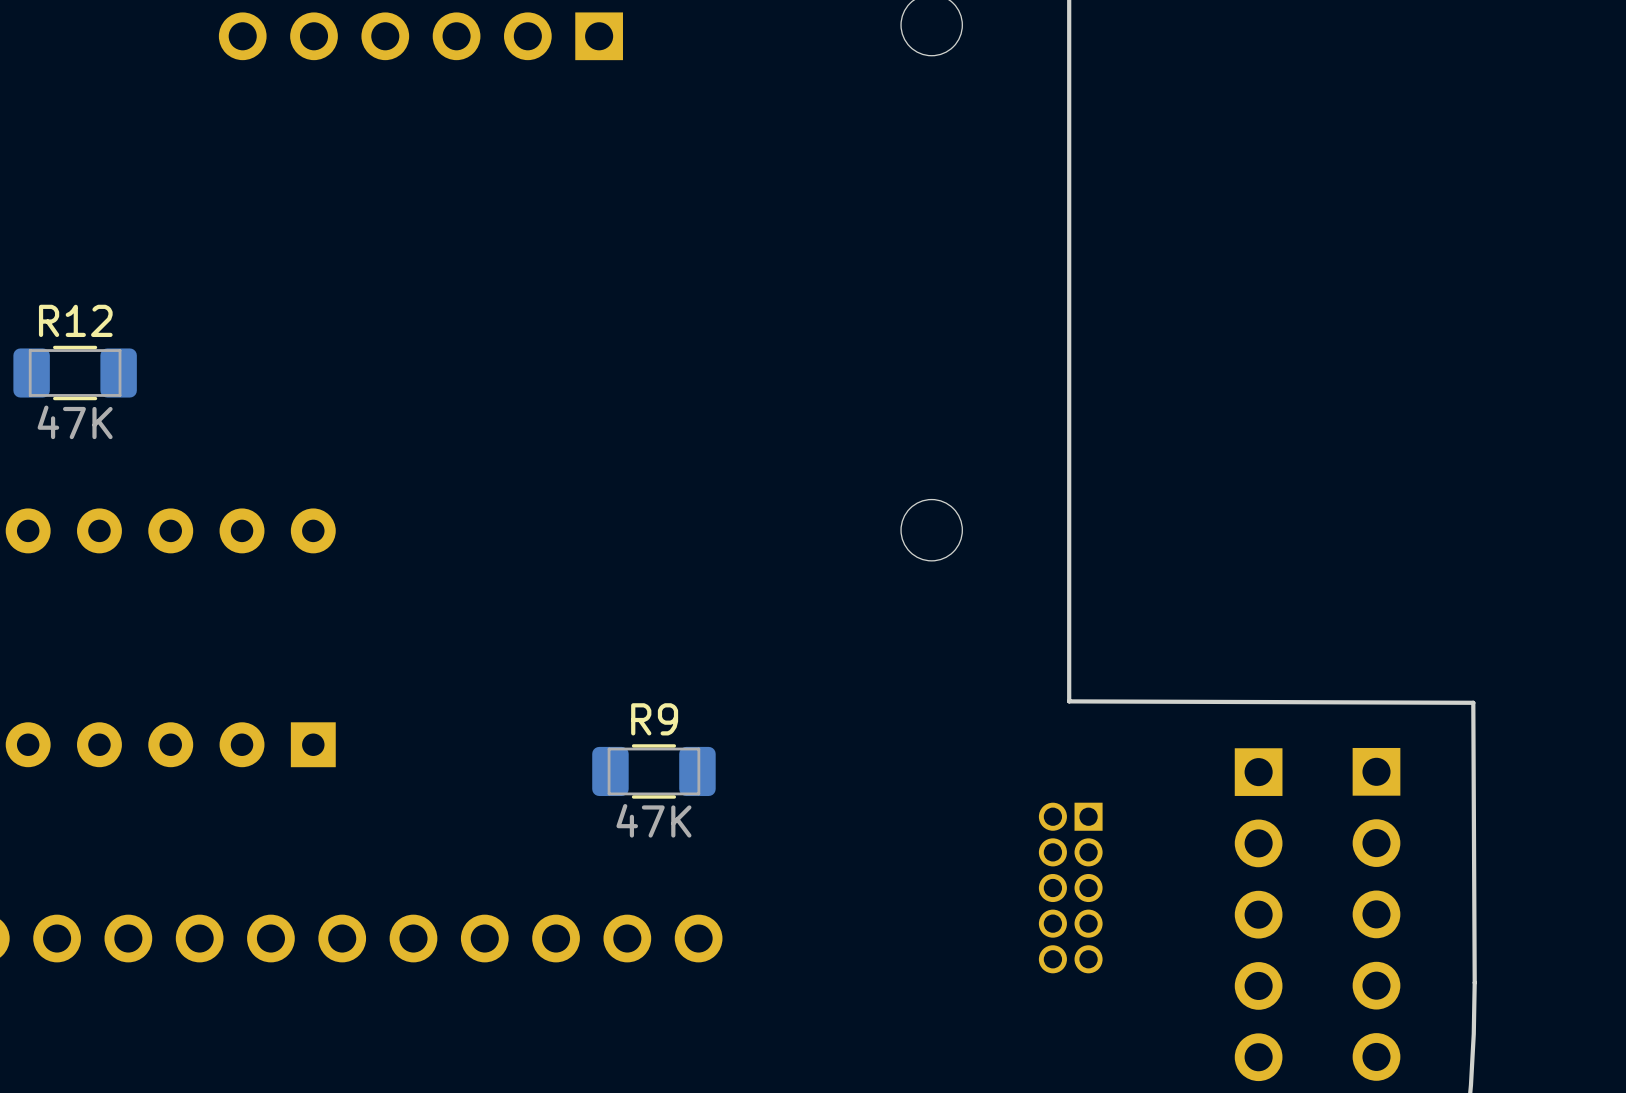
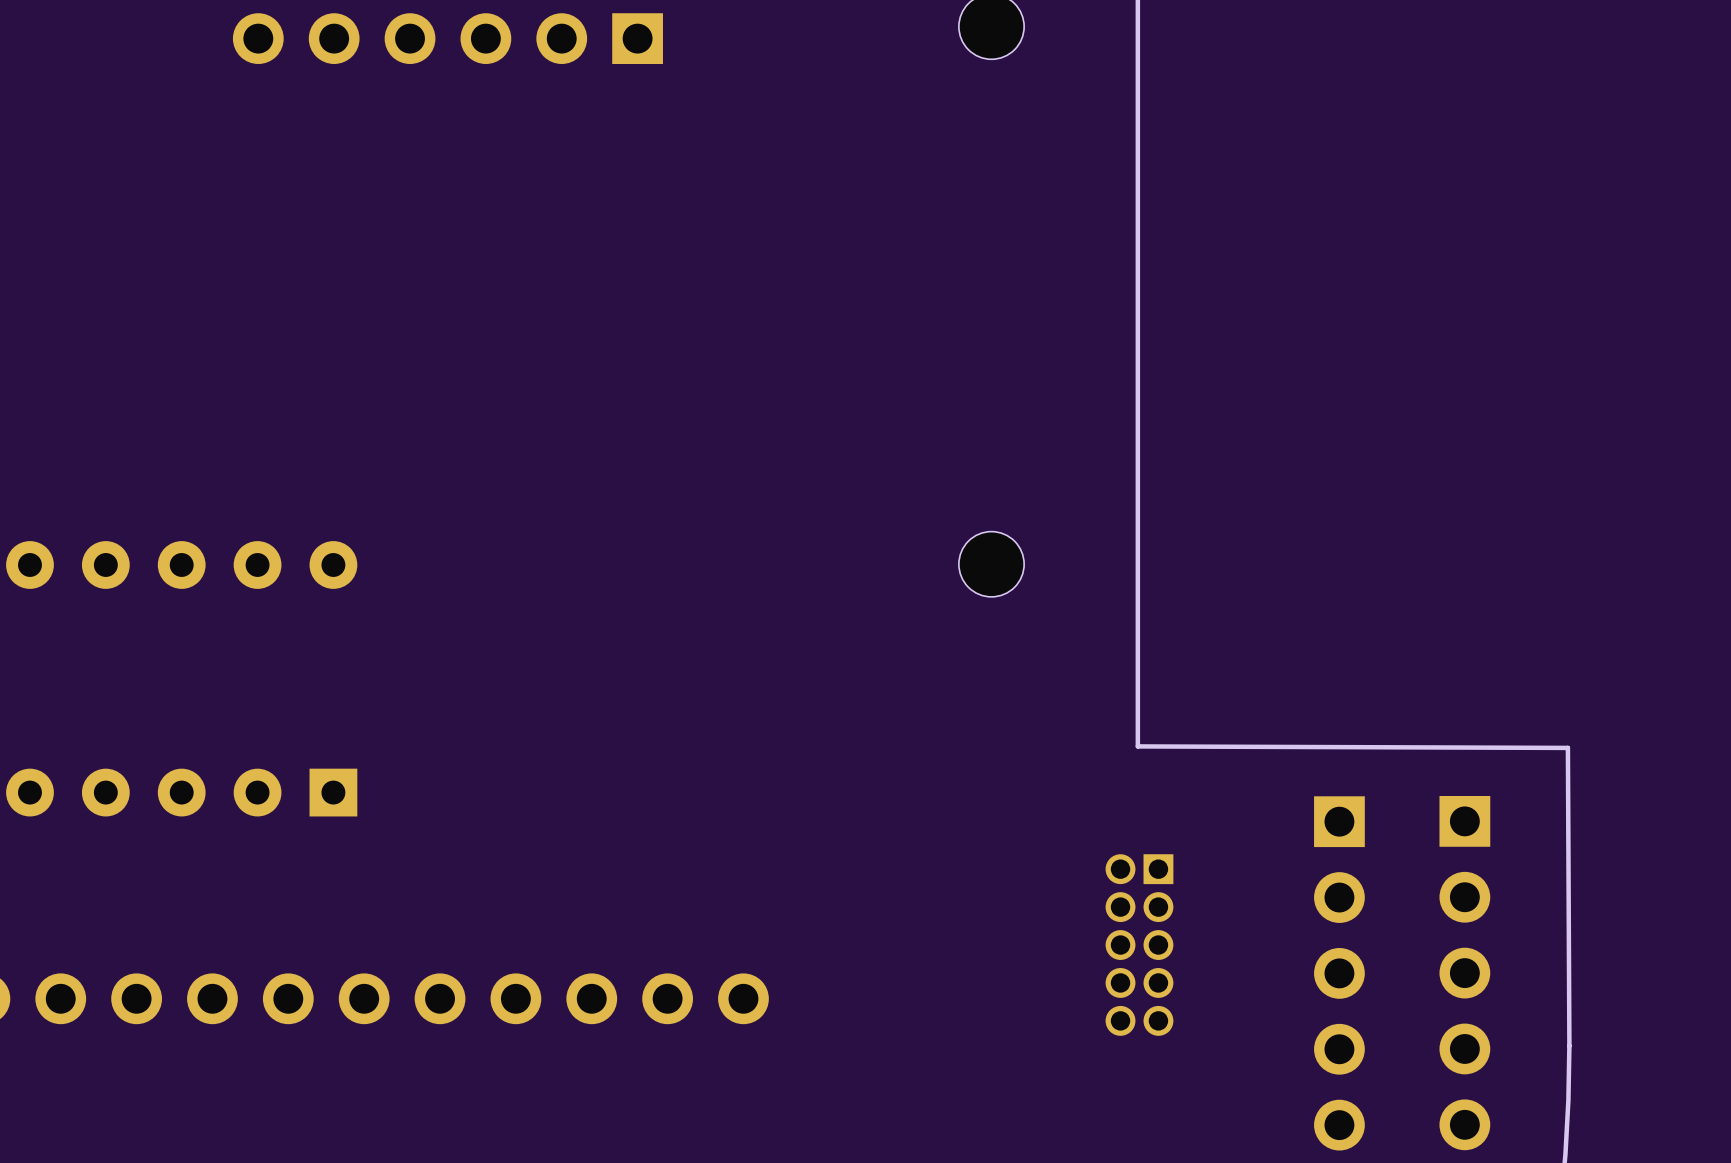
R12: 47K (75, 373) -> none
R9: 47K (653, 771) -> none

